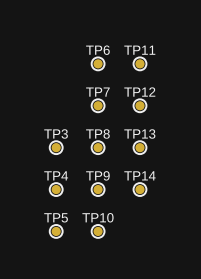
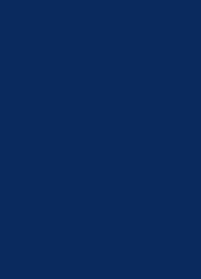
TP6: (98, 63) -> none
TP11: (139, 63) -> none
TP7: (98, 105) -> none
TP12: (139, 105) -> none
TP3: (56, 147) -> none
TP8: (98, 147) -> none
TP13: (139, 147) -> none
TP4: (56, 189) -> none
TP9: (98, 189) -> none
TP14: (139, 189) -> none
TP5: (56, 231) -> none
TP10: (98, 231) -> none

